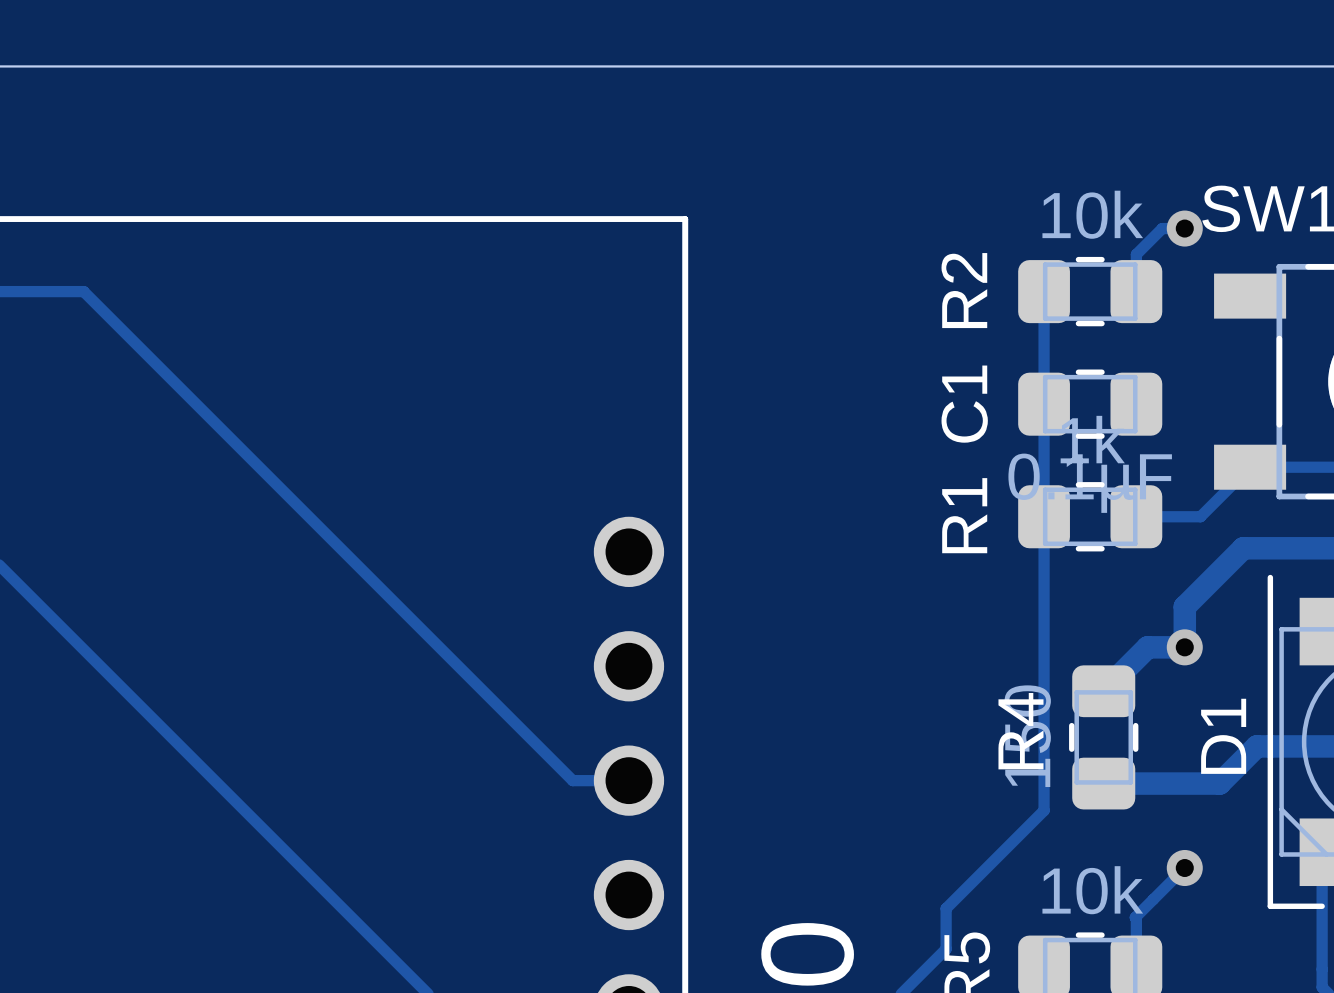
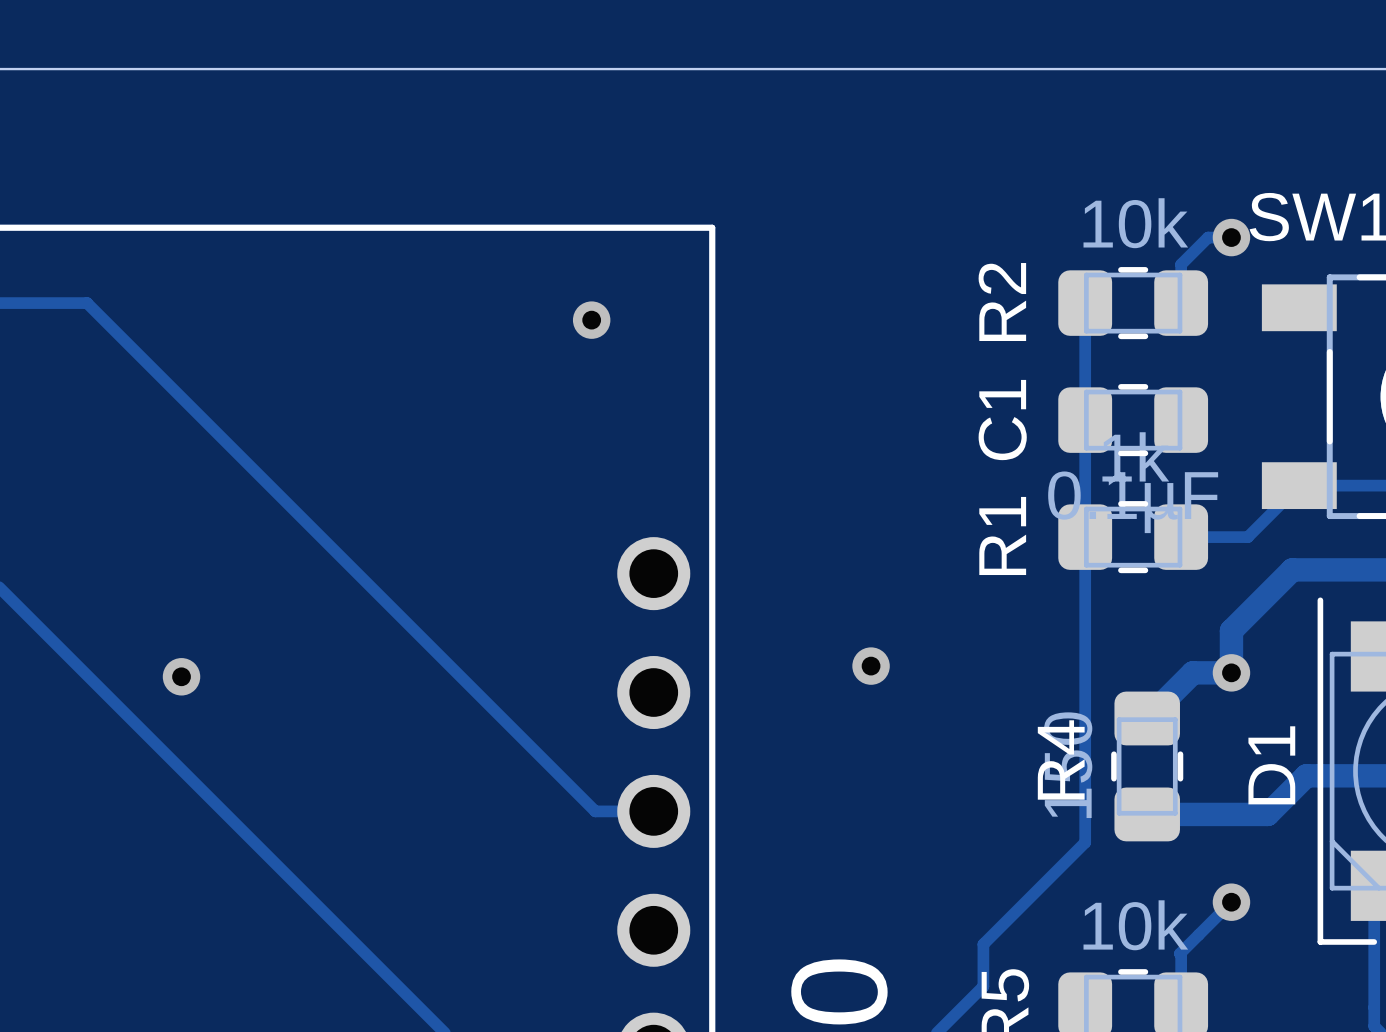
via: none -> (591, 320)
via: none -> (871, 666)
via: none -> (181, 676)

